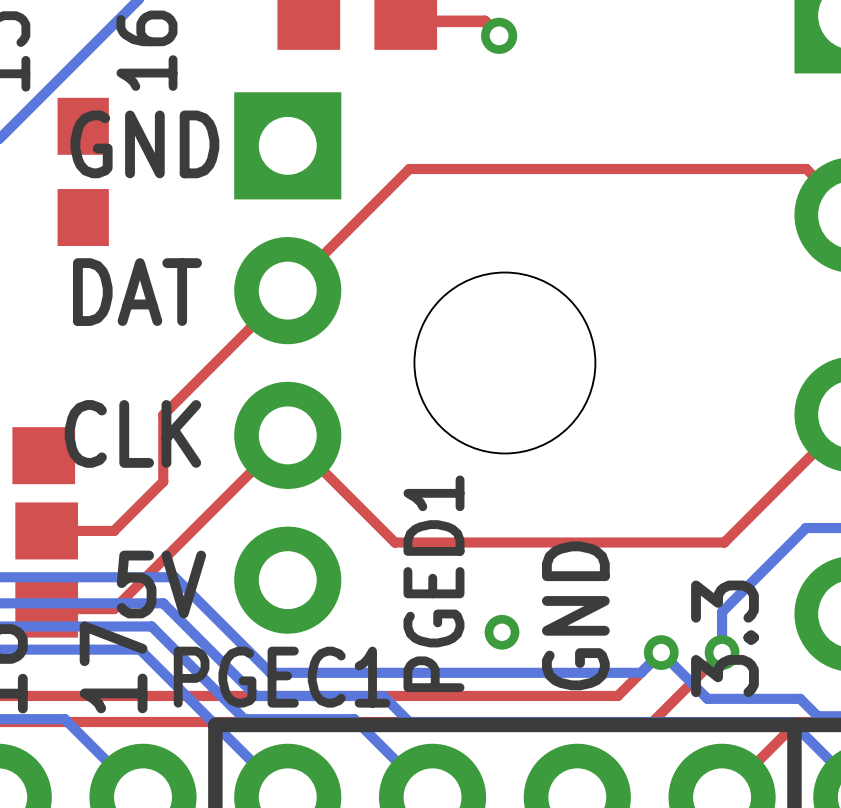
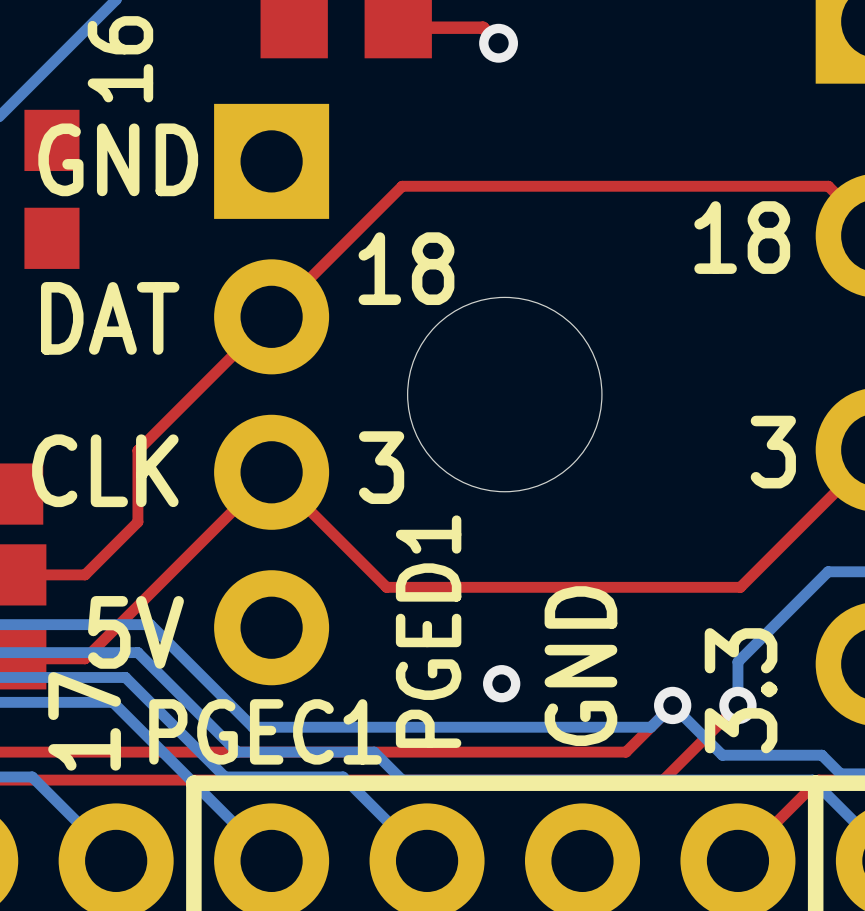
text: none -> 18 (742, 237)
text: none -> 18 (406, 268)
text: none -> 3 (773, 452)
text: none -> 3 (381, 467)

